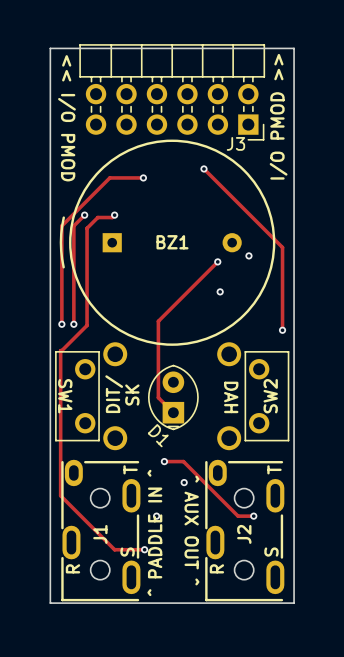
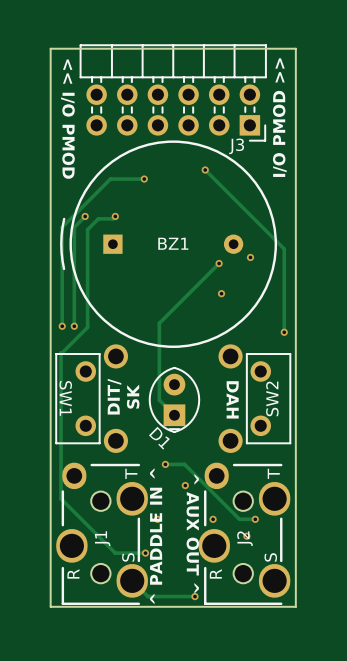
J1 footprint: [61, 459, 141, 602] -> [56, 462, 148, 606]
J2 footprint: [205, 459, 285, 602] -> [198, 462, 291, 606]
via: none -> (213, 519)
via: none -> (246, 536)
track: none -> (132, 580) (147, 596) (194, 596)
via: none -> (194, 596)

